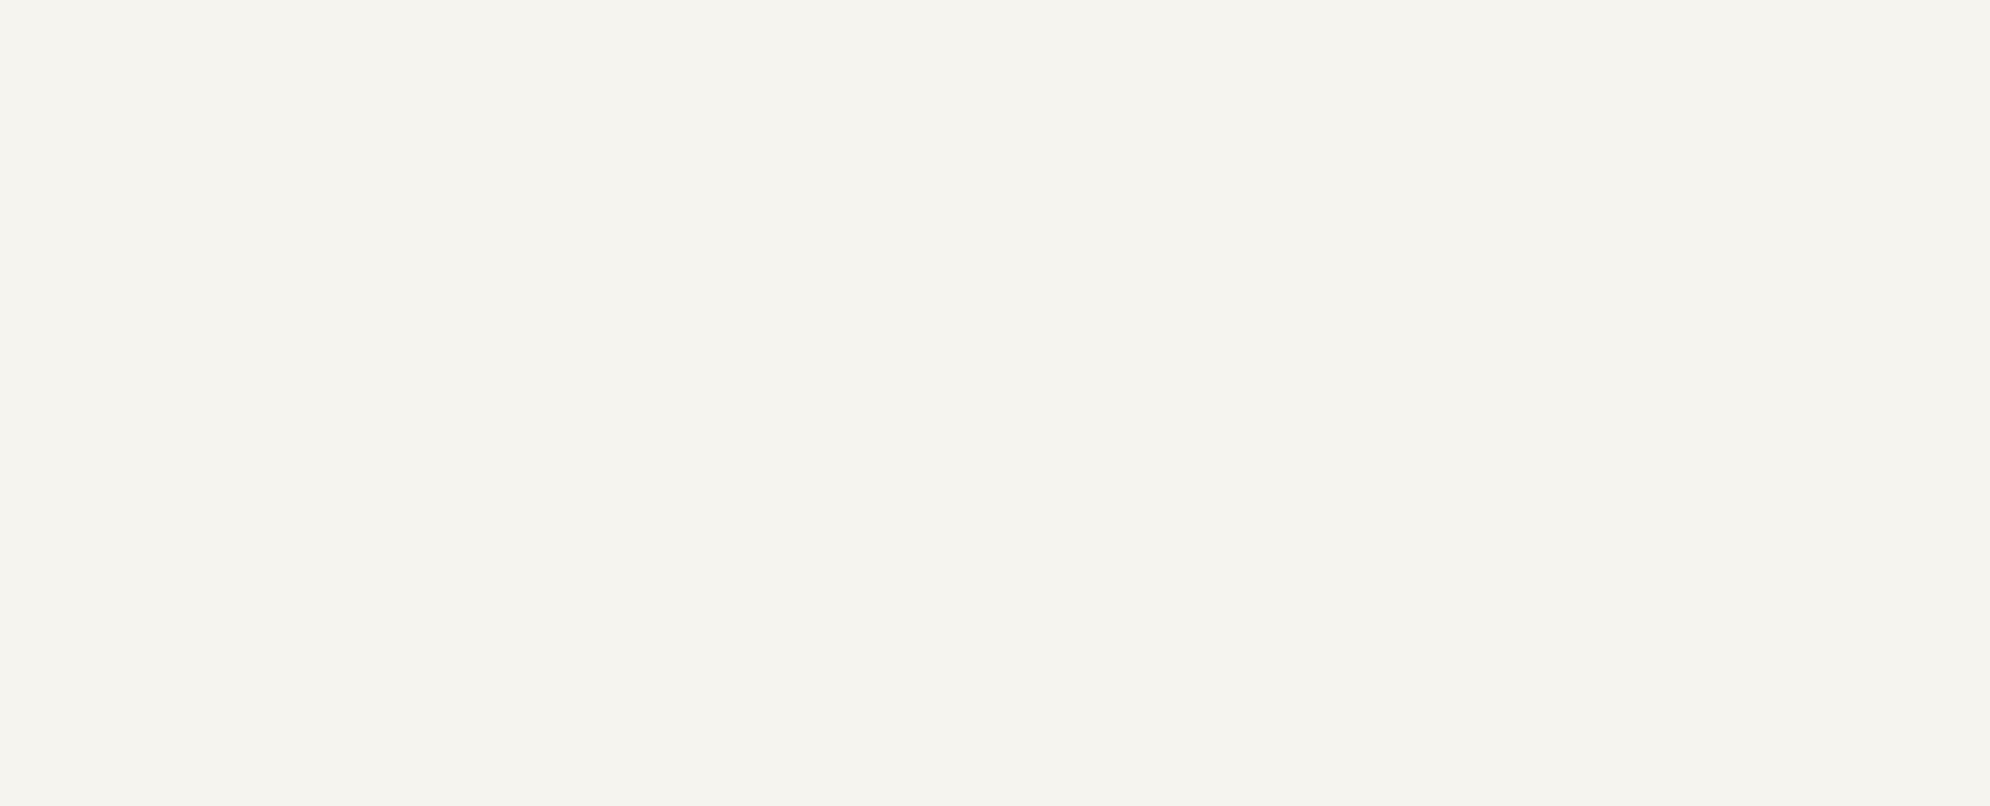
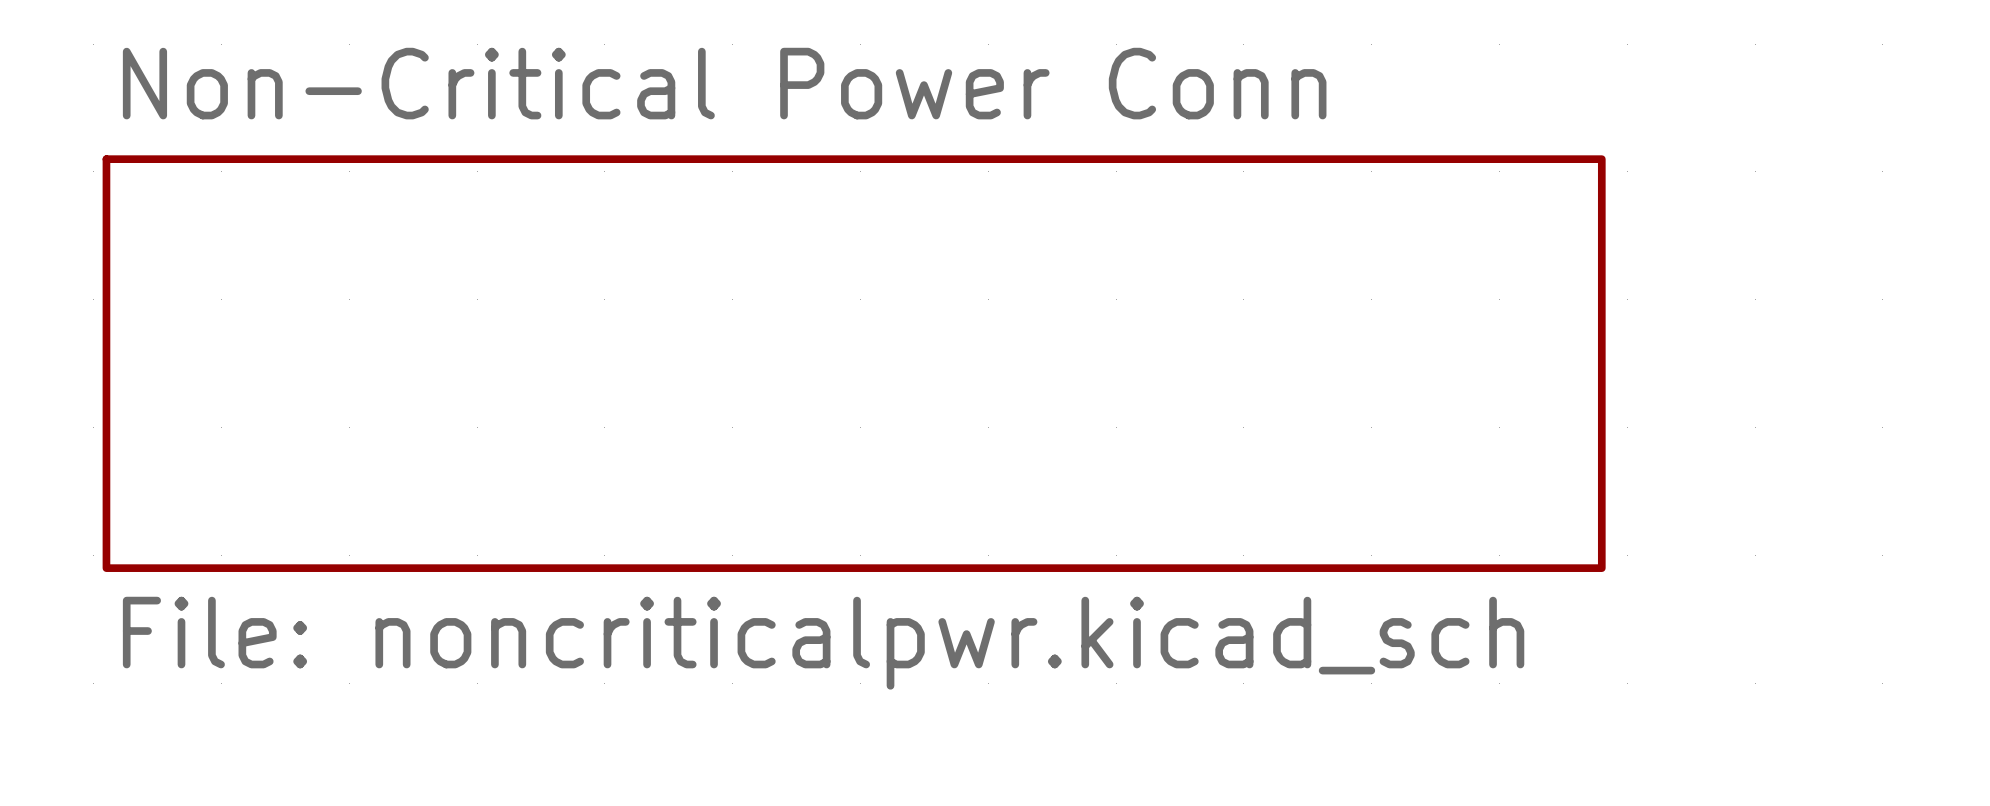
sheet Non-Critical Power Conn: none -> File: noncriticalpwr.kicad_sch (854, 363)

